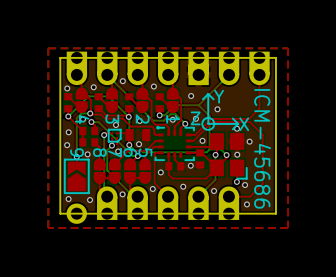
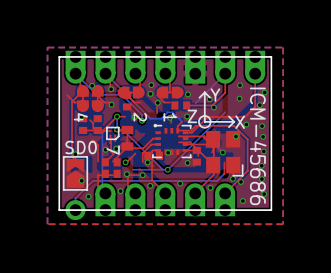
top track: none -> (225, 73) (225, 92) (212, 105) (186, 105)
via: (122, 81) -> none
via: none -> (240, 85)
part footprint: [75, 87, 88, 114] -> [77, 84, 89, 113]
part footprint: [166, 87, 179, 114] -> [156, 86, 184, 99]
via: (67, 88) -> none
via: none -> (111, 89)
part footprint: [94, 93, 103, 113] -> [91, 84, 104, 113]
part: none -> (131, 92)
via: none -> (264, 92)
top track: none -> (82, 93) (79, 93) (72, 101) (72, 156) (78, 163) (81, 163)
via: none -> (150, 93)
top track: (81, 96) (87, 96) (90, 100) (90, 113) -> none
bottom track: (98, 96) (88, 96) (68, 116) -> (96, 94) (75, 73)
bottom track: (108, 96) (129, 117) (129, 145) (134, 150) (206, 152) (209, 149) (209, 116) (198, 105) (174, 105) (164, 115) (159, 115) -> (106, 94) (121, 94) (142, 114) (142, 120)
top track: (142, 96) (151, 101) (151, 120) (155, 124) (165, 124) (168, 127) (168, 133) -> none
top track: (172, 96) (178, 96) (181, 98) (181, 120) (174, 126) (174, 133) -> none
part: (112, 100) -> none
part: (142, 100) -> none
via: none -> (209, 99)
via: none -> (239, 98)
part: (68, 102) -> none
part rotation: 0° (159, 102) -> 90° clockwise (180, 105)
part position: (159, 102) -> (180, 105)
via: none -> (157, 102)
via: none -> (111, 104)
via: none -> (259, 105)
top track: (68, 108) (68, 116) (82, 130) (82, 142) -> none
top track: (98, 108) (106, 115) (128, 116) (129, 108) -> none
top track: (90, 113) (101, 114) (105, 118) (122, 118) (130, 126) (151, 126) (155, 134) (160, 134) -> none
bottom track: (90, 113) (81, 113) (76, 117) (76, 156) -> none
via: (90, 113) -> none
bottom track: none -> (225, 112) (167, 169) (133, 169)
via: (159, 115) -> none
via: (68, 116) -> none
via: (128, 116) -> none
top track: none -> (171, 115) (171, 122)
bottom track: none -> (117, 116) (117, 129) (122, 129) (162, 169)
via: none -> (117, 116)
top track: none -> (125, 116) (117, 116) (103, 130) (83, 130)
via: none -> (187, 116)
via: (195, 118) -> none
text: 3 (112, 119) -> none
via: none -> (134, 117)
via: (139, 120) -> none
bottom track: (91, 122) (98, 122) (132, 156) (137, 156) -> none
via: (91, 122) -> none
via: none -> (142, 120)
via: (185, 123) -> none
via: (116, 125) -> none
part: none -> (83, 124)
part: none -> (97, 124)
via: none -> (246, 124)
via: (237, 128) -> none
via: none -> (262, 126)
part: (88, 130) -> none
via: none -> (117, 129)
via: (68, 132) -> none
top track: none -> (179, 130) (191, 130) (195, 125) (233, 125) (247, 139) (247, 170)
part rotation: 0° (137, 134) -> 90° clockwise (127, 138)
via: (104, 135) -> none
top track: none -> (179, 136) (204, 136) (213, 147) (213, 174) (195, 193)
via: none -> (236, 136)
via: none -> (263, 136)
top track: (188, 140) (193, 140) (212, 122) (249, 122) (262, 134) (262, 184) (250, 196) (228, 196) -> (247, 170) (225, 193)
via: (202, 140) -> none
via: (249, 141) -> none
part: (88, 142) -> none
top track: none -> (111, 141) (111, 151) (113, 154) (105, 162)
via: (139, 144) -> none
top track: none -> (179, 142) (190, 142) (198, 150) (198, 155)
via: (67, 145) -> none
bottom track: (111, 145) (107, 150) (107, 170) (133, 196) (137, 196) -> none
via: (111, 145) -> none
via: (129, 145) -> none
text: none -> SD0 (81, 147)
text: 9 (77, 152) -> none
text: 8 (99, 152) -> none
via: none -> (105, 149)
text: 6 (130, 152) -> none
text: 5 (145, 152) -> none
via: (87, 154) -> none
top track: (168, 154) (168, 174) (172, 178) (206, 178) (226, 158) (226, 155) -> none
top track: (174, 154) (174, 159) (180, 166) -> none
via: (215, 154) -> none
via: (237, 154) -> none
via: none -> (263, 151)
via: none -> (168, 152)
bottom track: (215, 155) (215, 179) (198, 196) -> none
via: (137, 156) -> none
part: none -> (111, 162)
via: none -> (125, 162)
via: none -> (147, 162)
top track: none -> (224, 162) (224, 174)
part position: (174, 166) -> (153, 155)
via: none -> (261, 165)
part: (99, 171) -> none
part: (114, 171) -> none
part: (130, 171) -> none
part: (145, 171) -> none
via: (160, 172) -> none
via: none -> (167, 169)
part: none -> (111, 173)
via: none -> (126, 174)
bottom track: none -> (224, 174) (217, 180) (92, 180) (75, 198) (75, 206)
via: none -> (142, 175)
via: none -> (261, 179)
via: none -> (81, 180)
via: none -> (264, 194)
via: (68, 199) -> none

